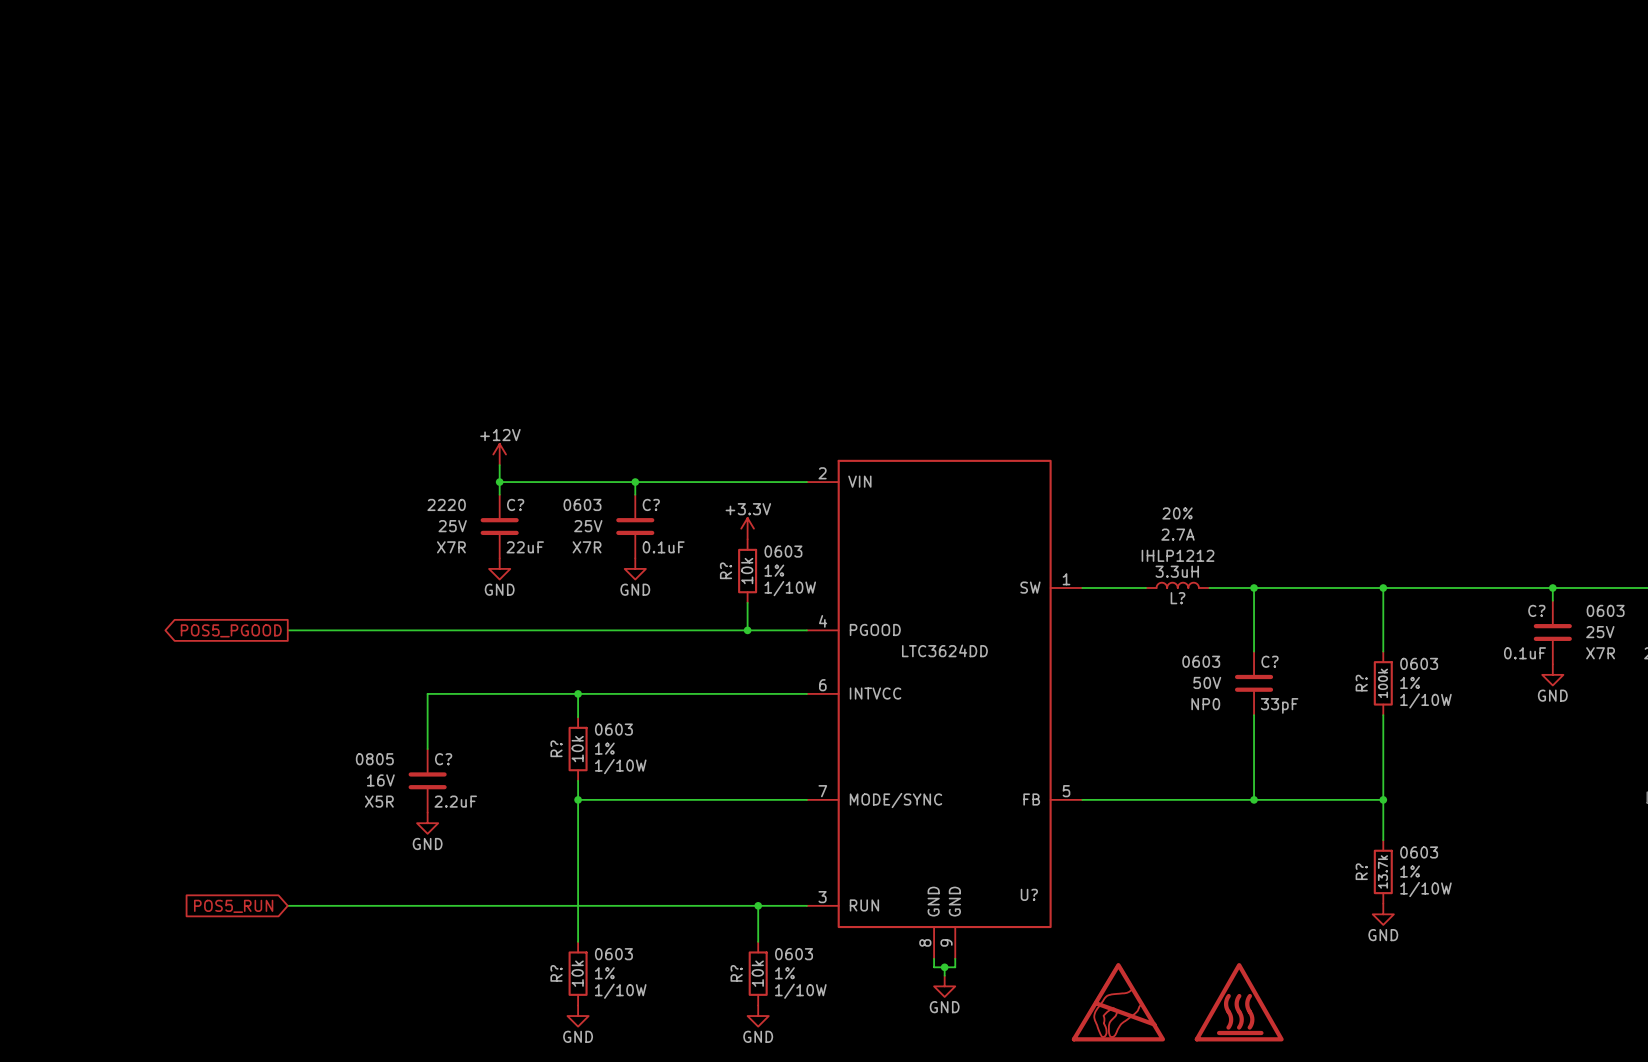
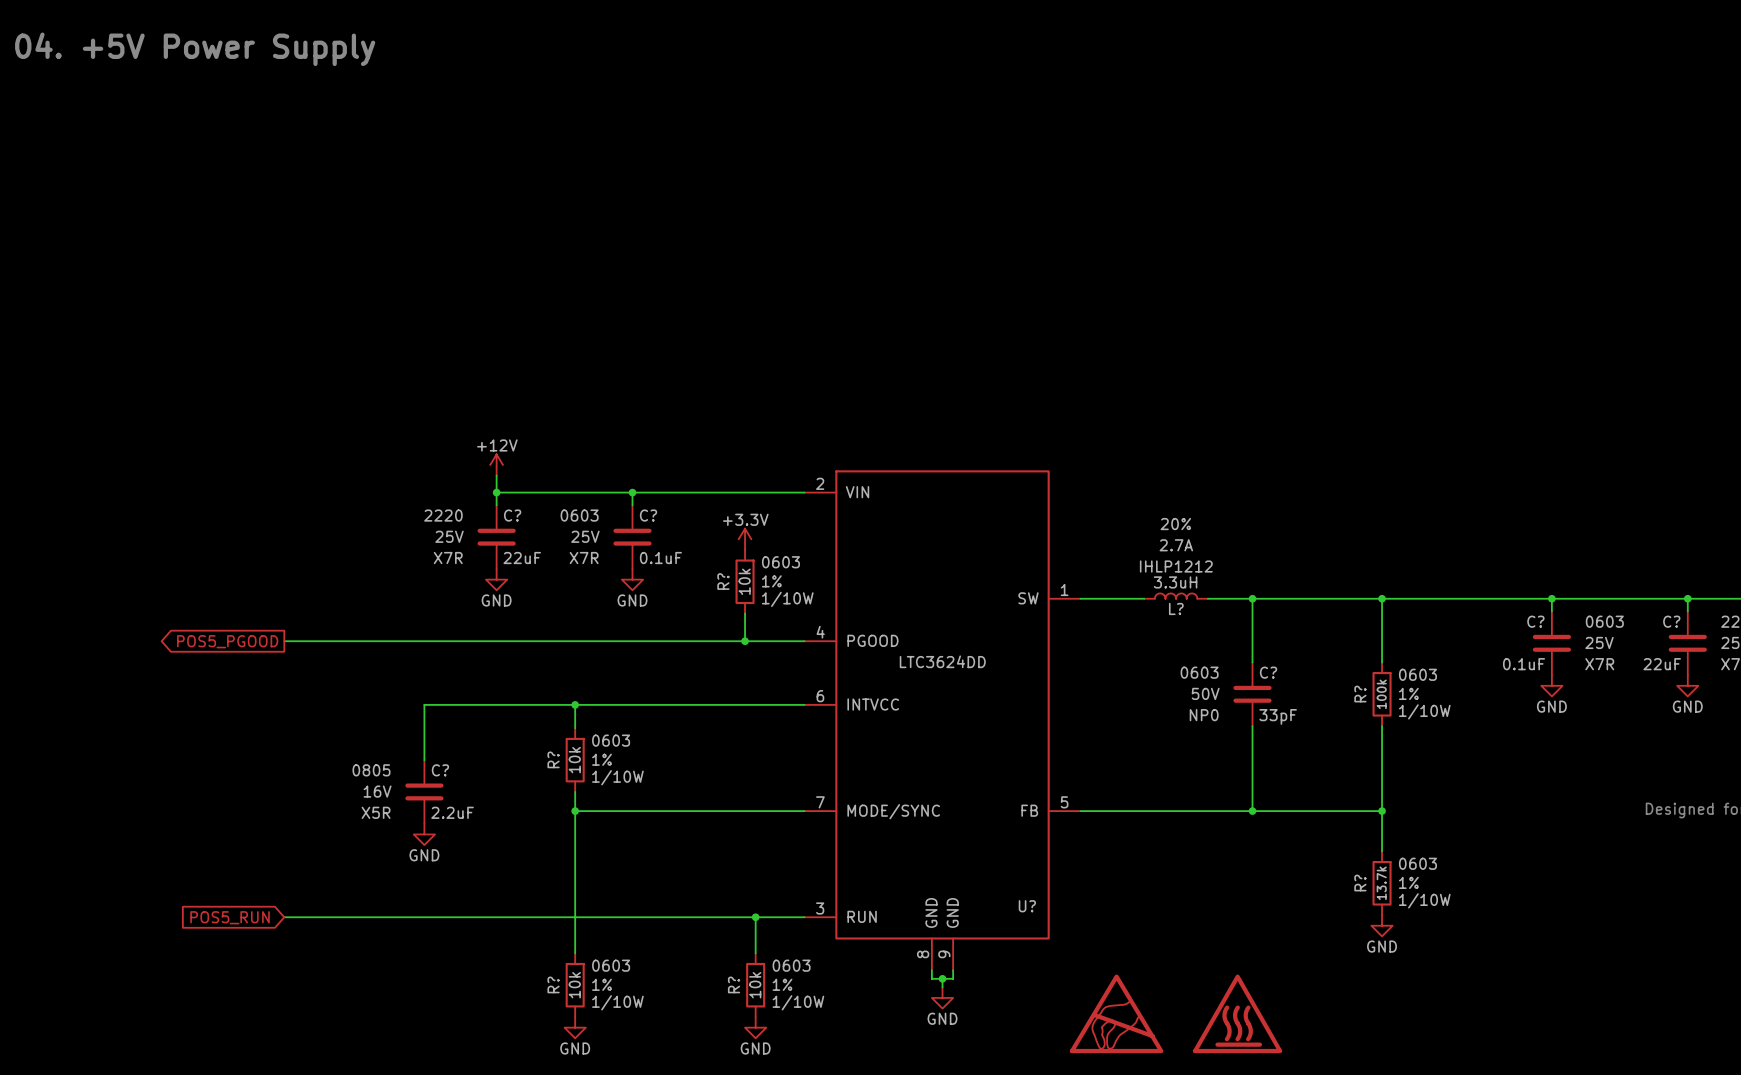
text: none -> 04. +5V Power Supply (195, 49)

